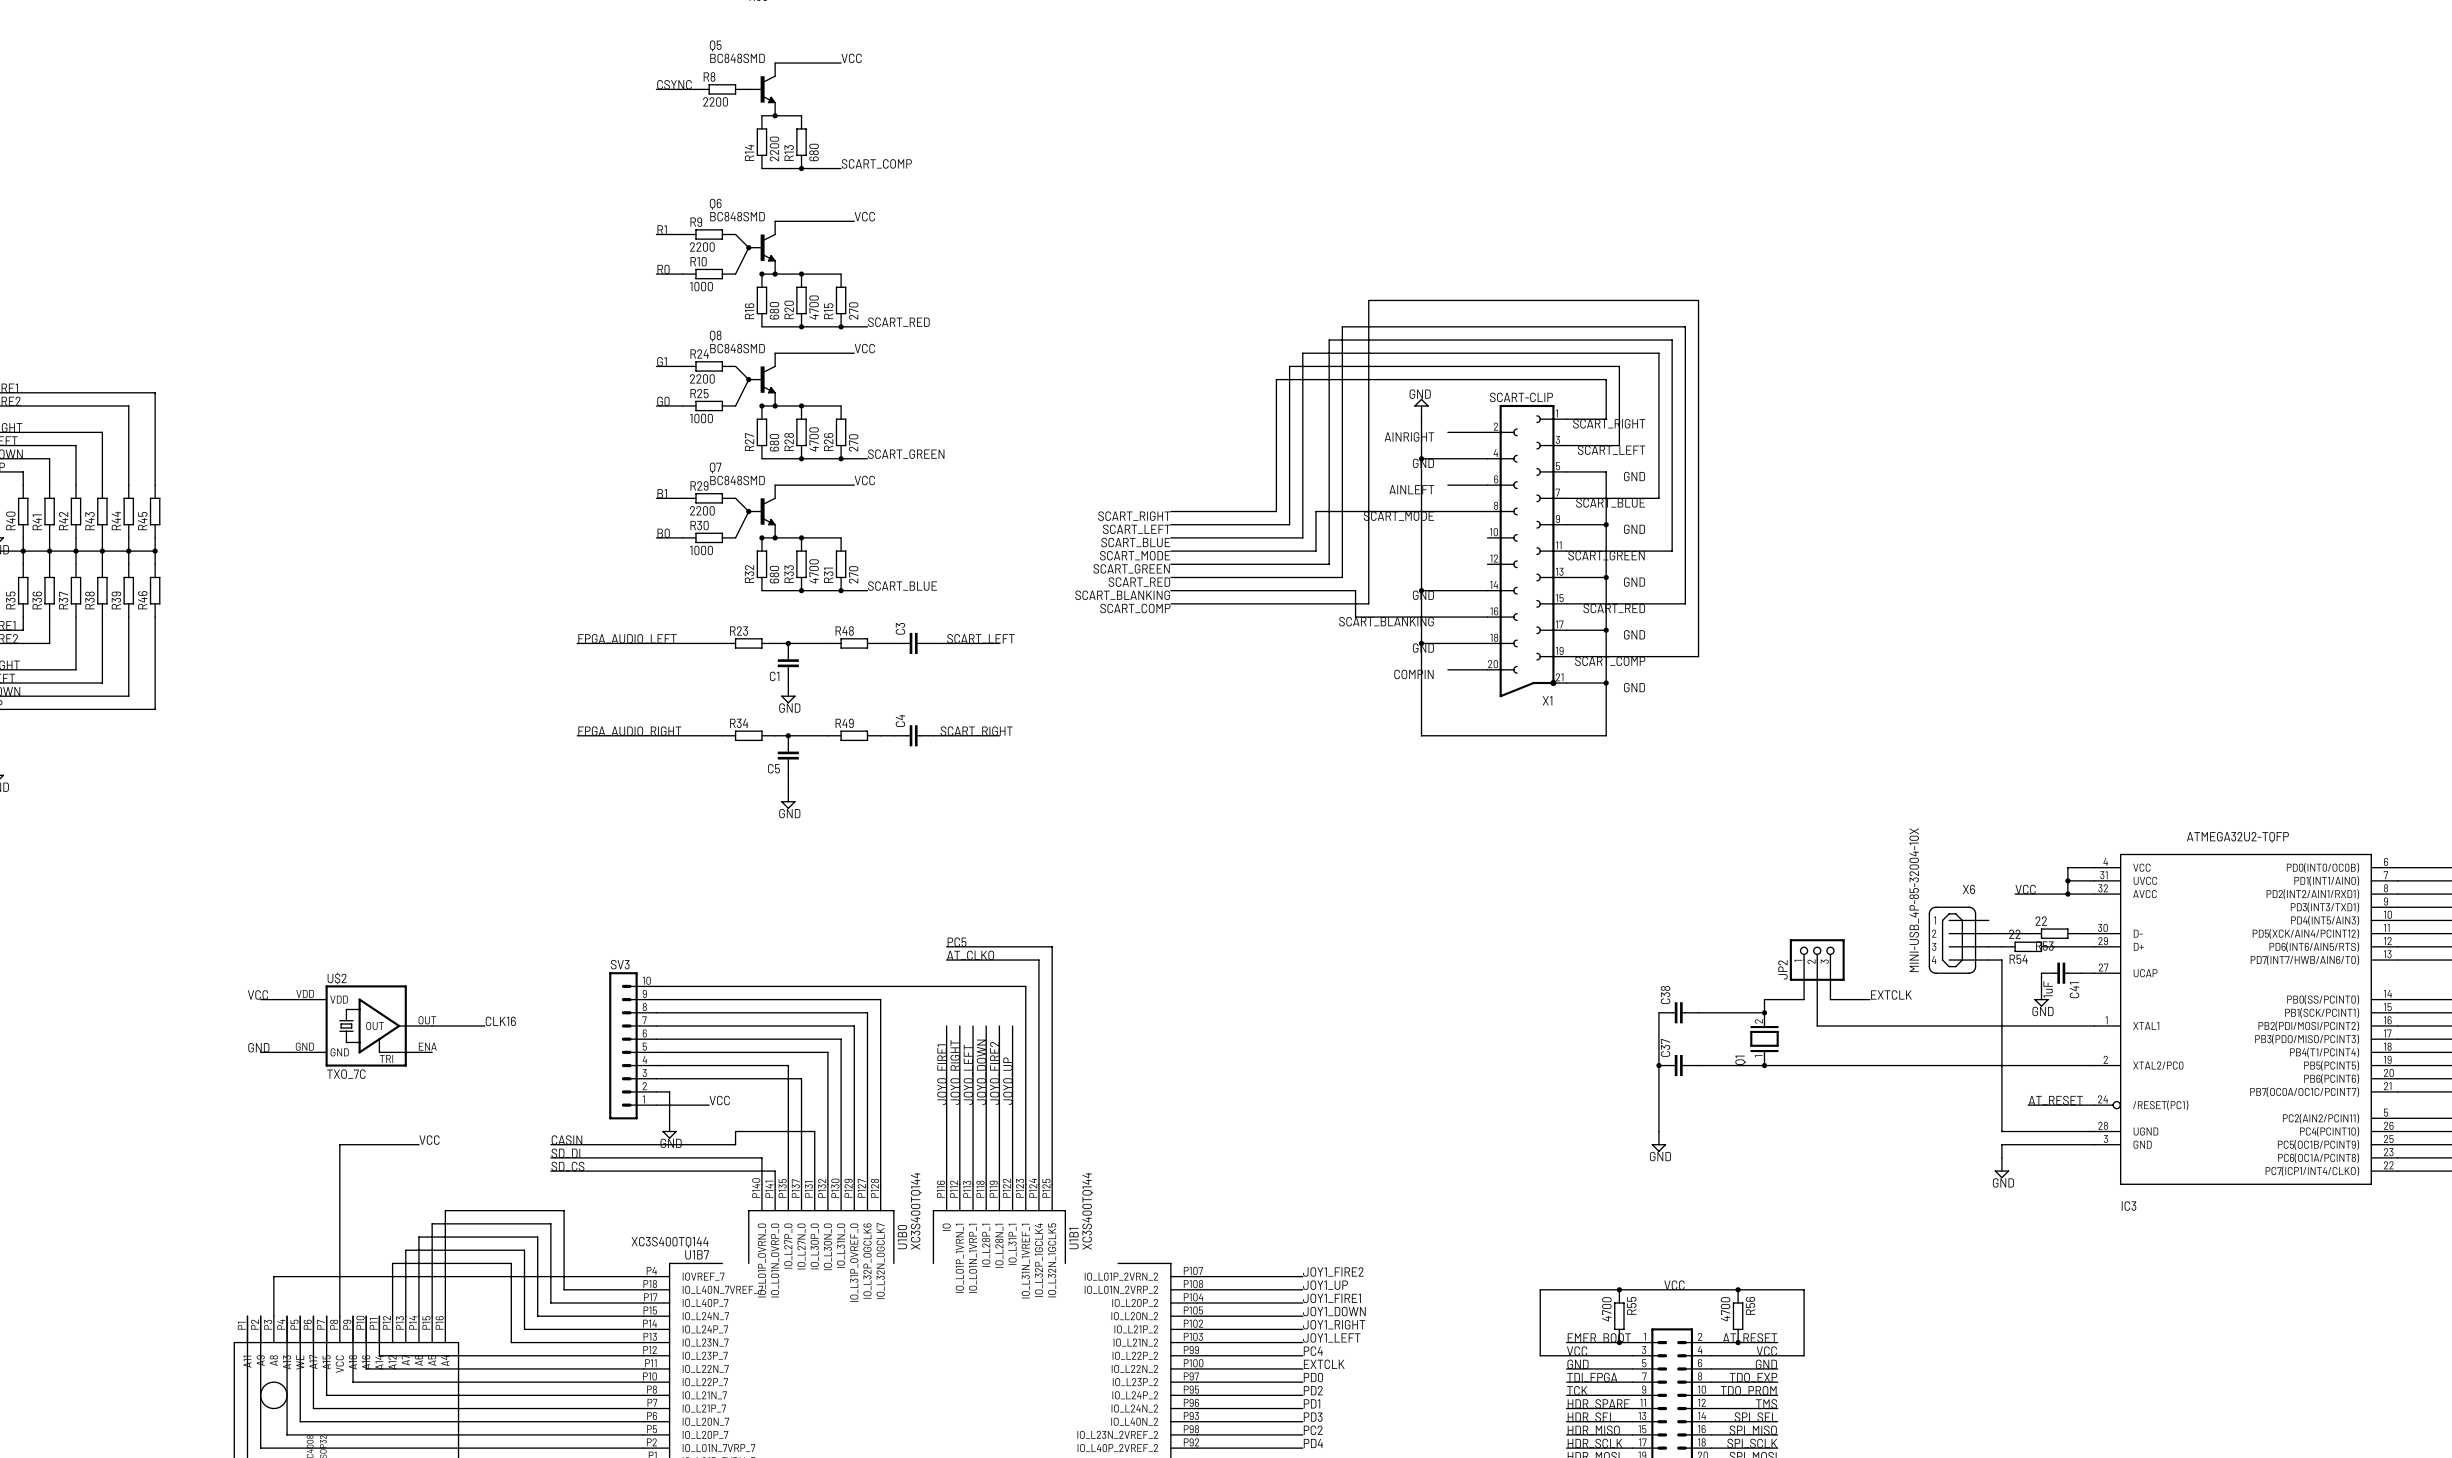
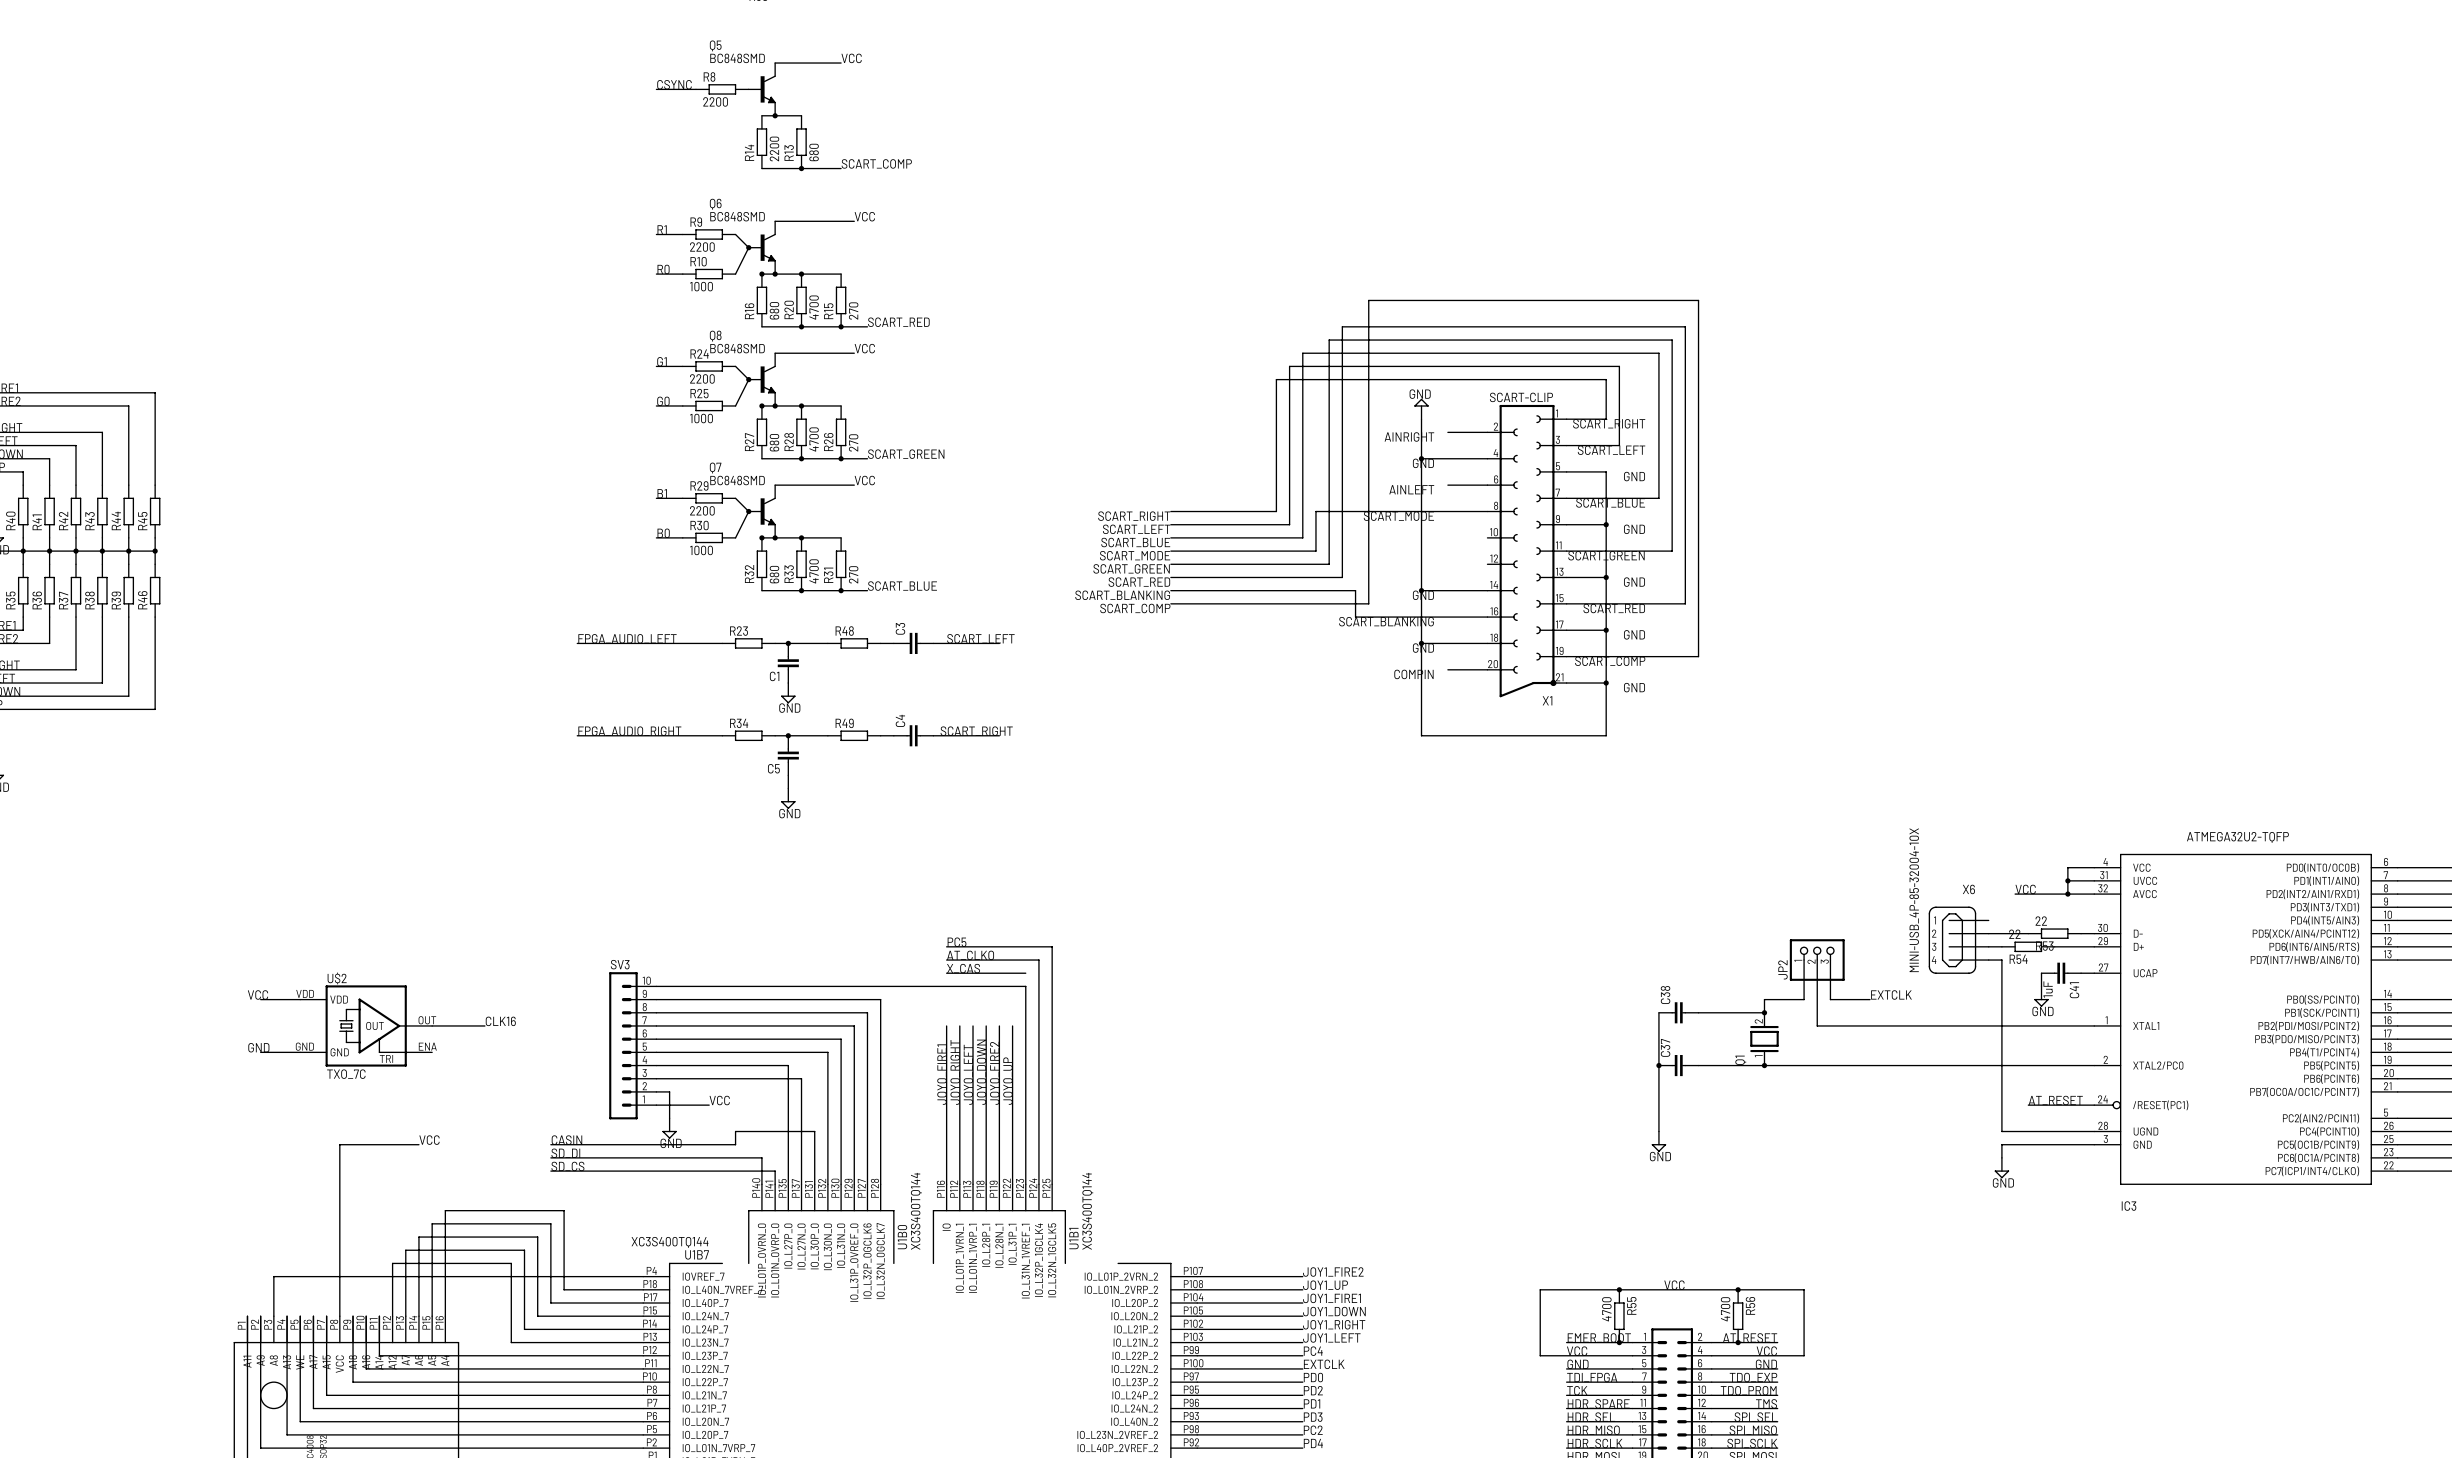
label: none -> X_CAS (963, 968)
wire: none -> (946, 973) (1025, 973)

